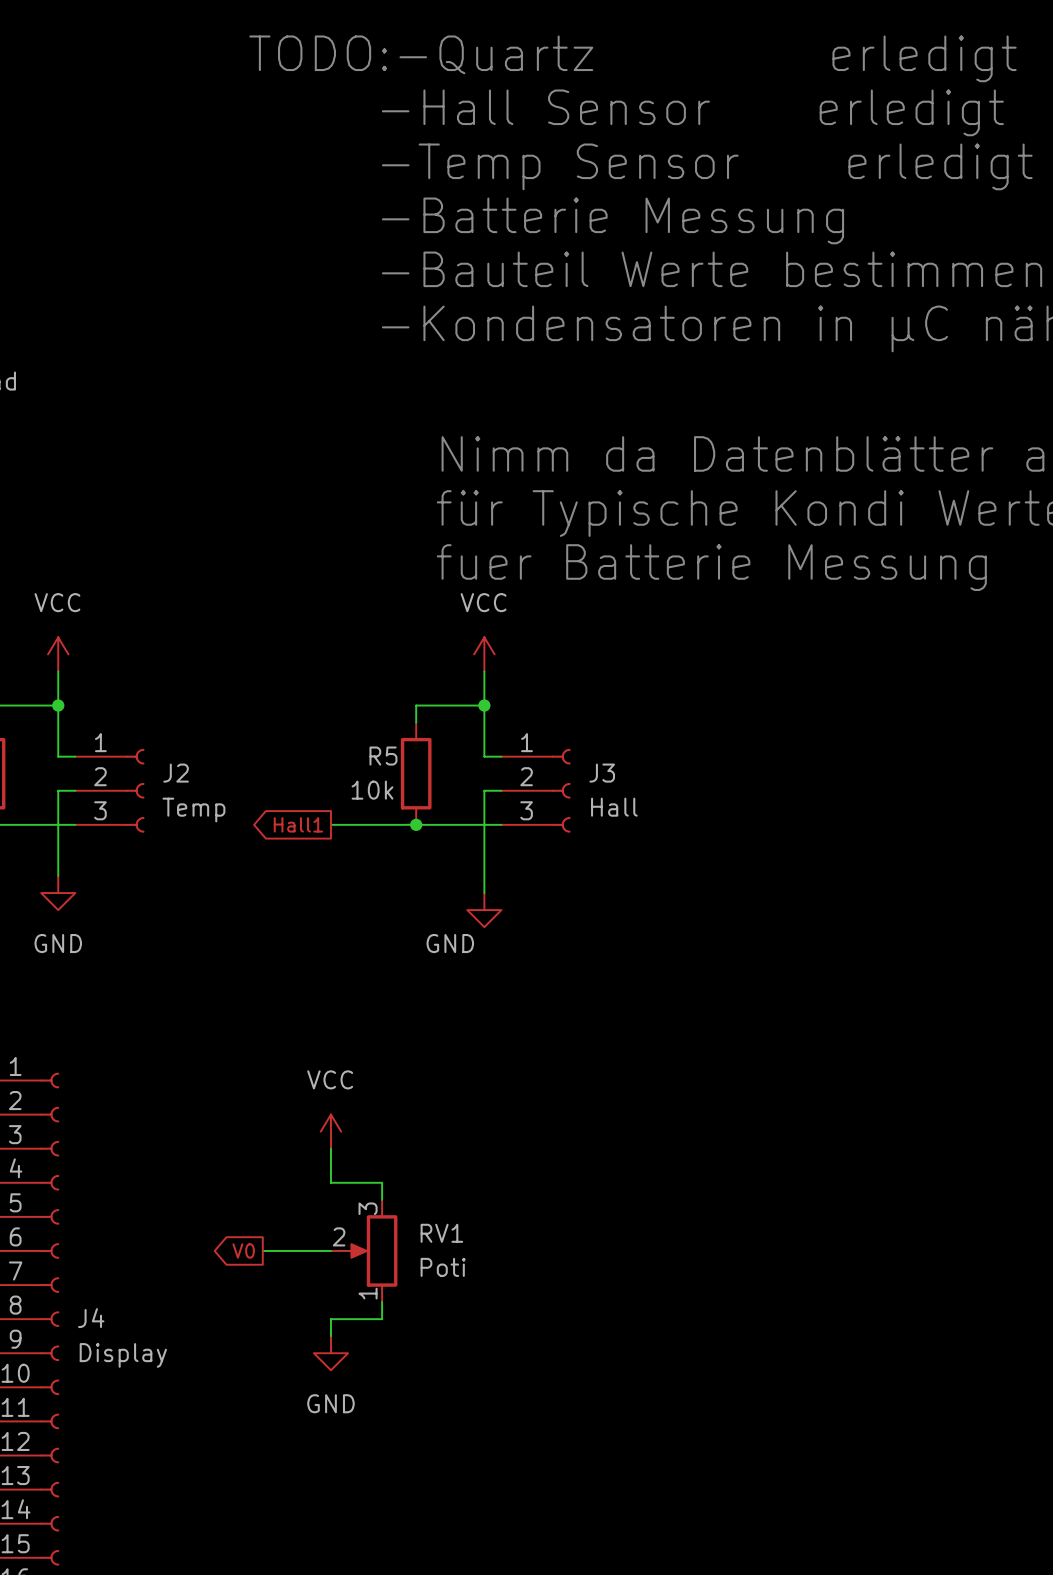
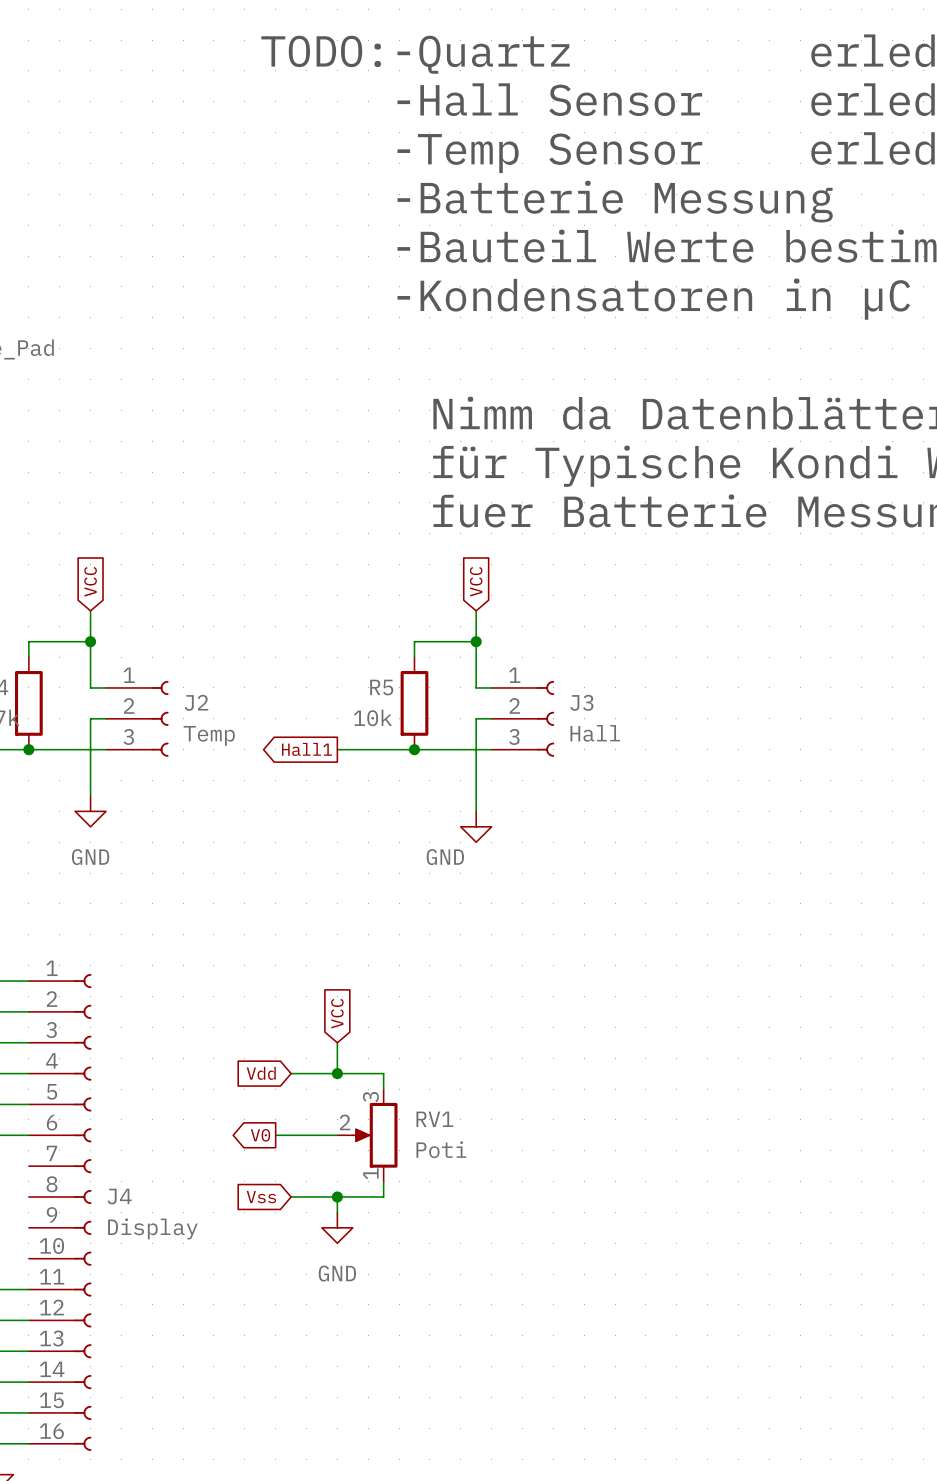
global label: none -> VCC (90, 581)
global label: none -> VCC (476, 581)
power symbol: VCC (58, 654) -> none
power symbol: VCC (484, 654) -> none
global label: none -> VCC (337, 1013)
power symbol: VCC (330, 1131) -> none
global label: none -> Vdd (261, 1073)
wire: none -> (291, 1073) (337, 1073)
junction: none -> (337, 1073)
global label: none -> Vss (261, 1197)
wire: none -> (291, 1196) (337, 1196)
junction: none -> (337, 1196)

